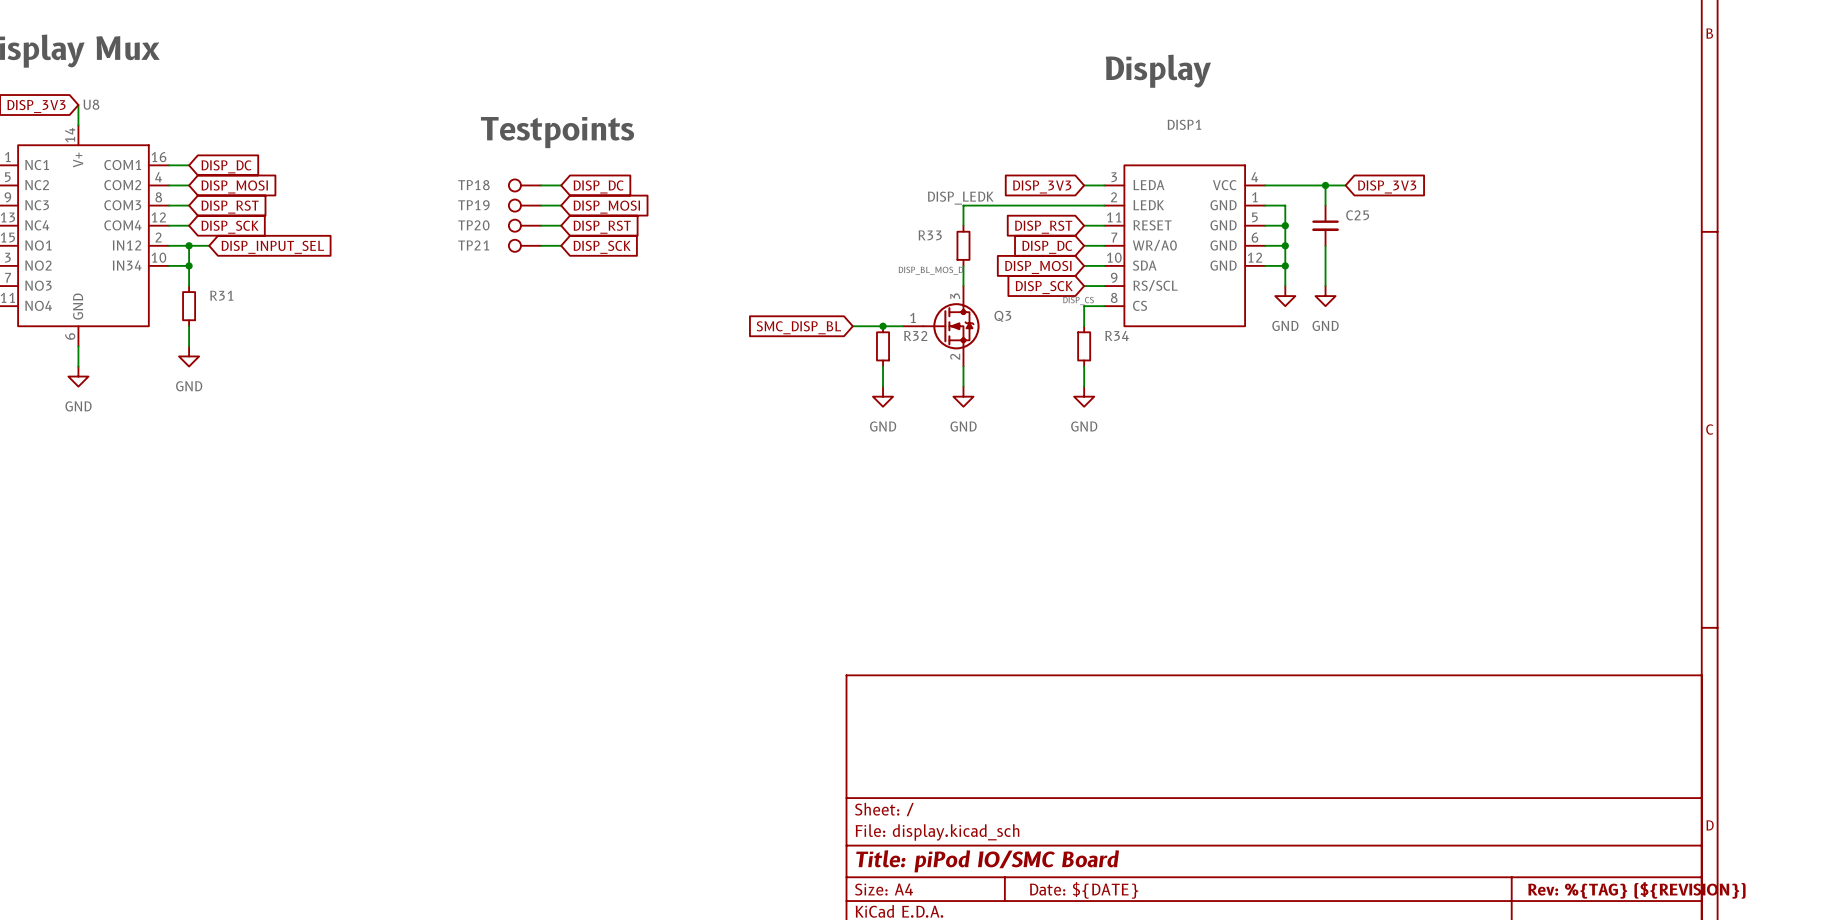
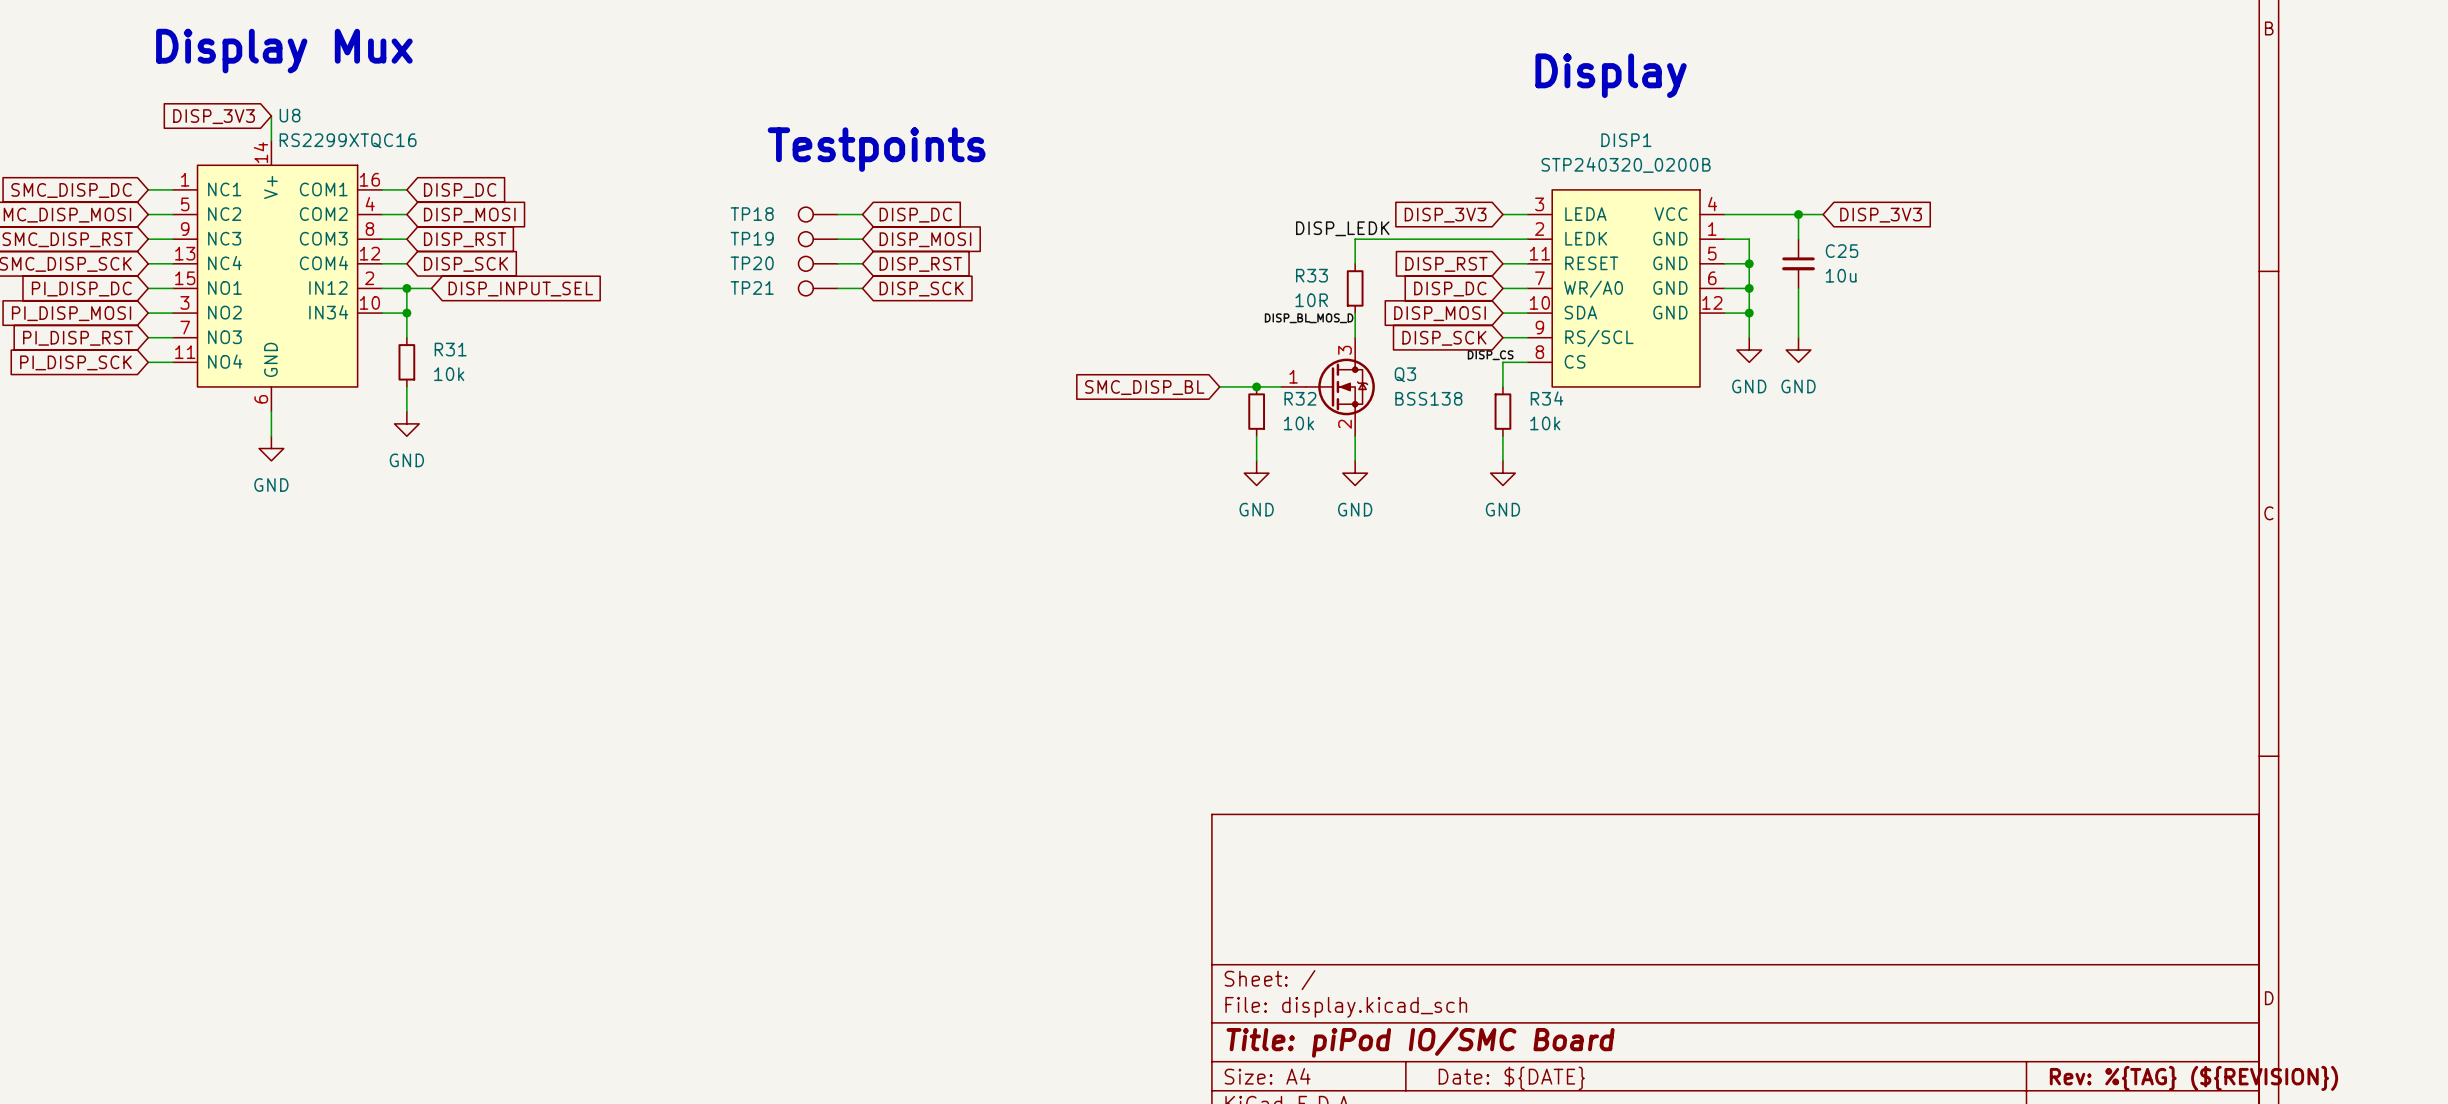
U8 value: none -> RS2299XTQC16 (348, 140)
DISP1 value: none -> STP240320_0200B (1626, 165)
C25 value: none -> 10u (1841, 275)
R33 value: none -> 10R (1311, 300)
R31 value: none -> 10k (449, 374)
Q3 value: none -> BSS138 (1428, 398)
R32 value: none -> 10k (1298, 423)
R34 value: none -> 10k (1545, 423)

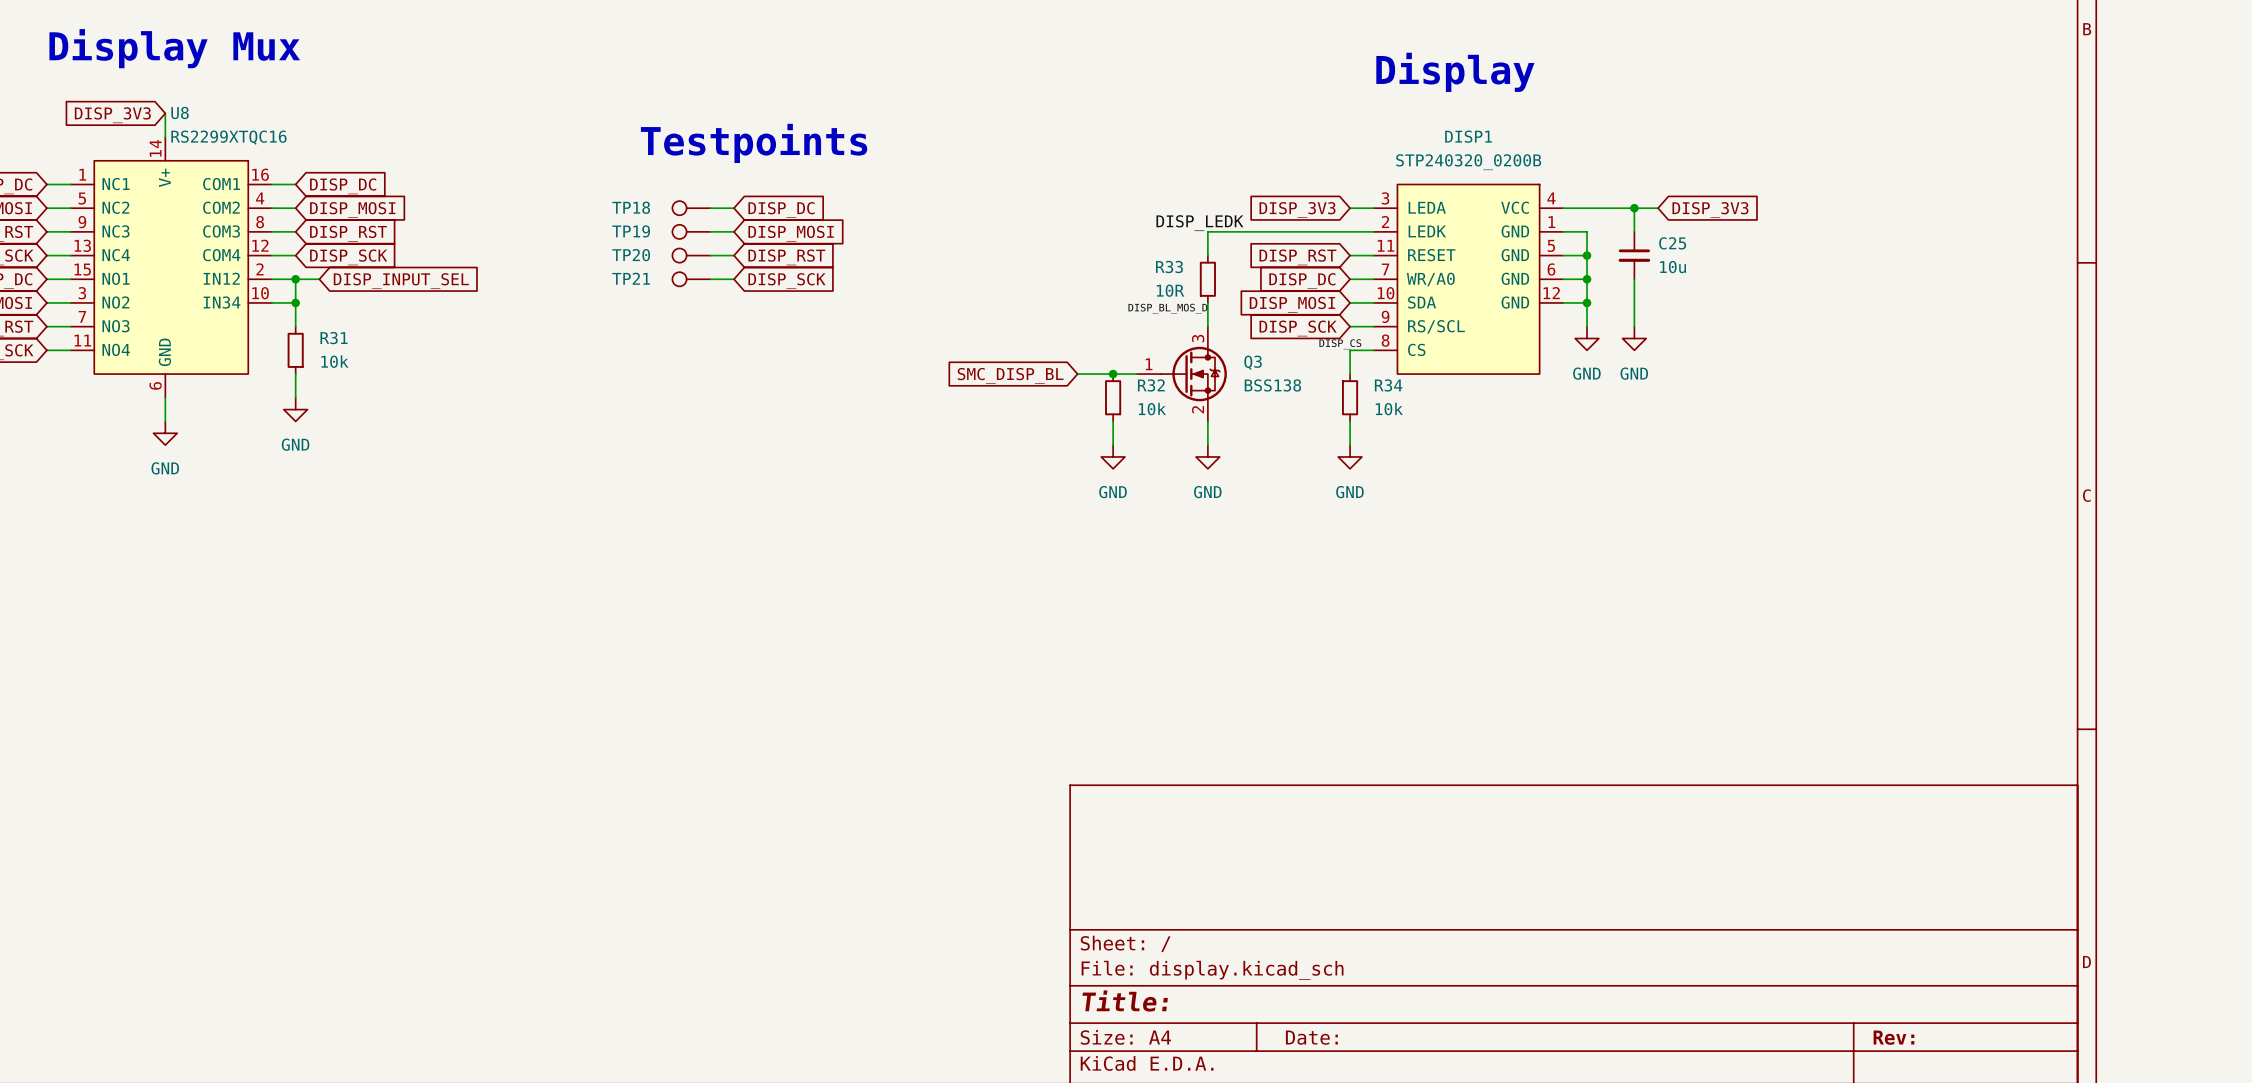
title block: Title: piPod IO/SMC Board (1420, 1042) -> Title: (1125, 1001)
title block: Date: ${DATE} (1511, 1078) -> Date: (1311, 1037)
title block: Rev: %{TAG} (${REVISION}) (2193, 1078) -> Rev: (1893, 1037)

